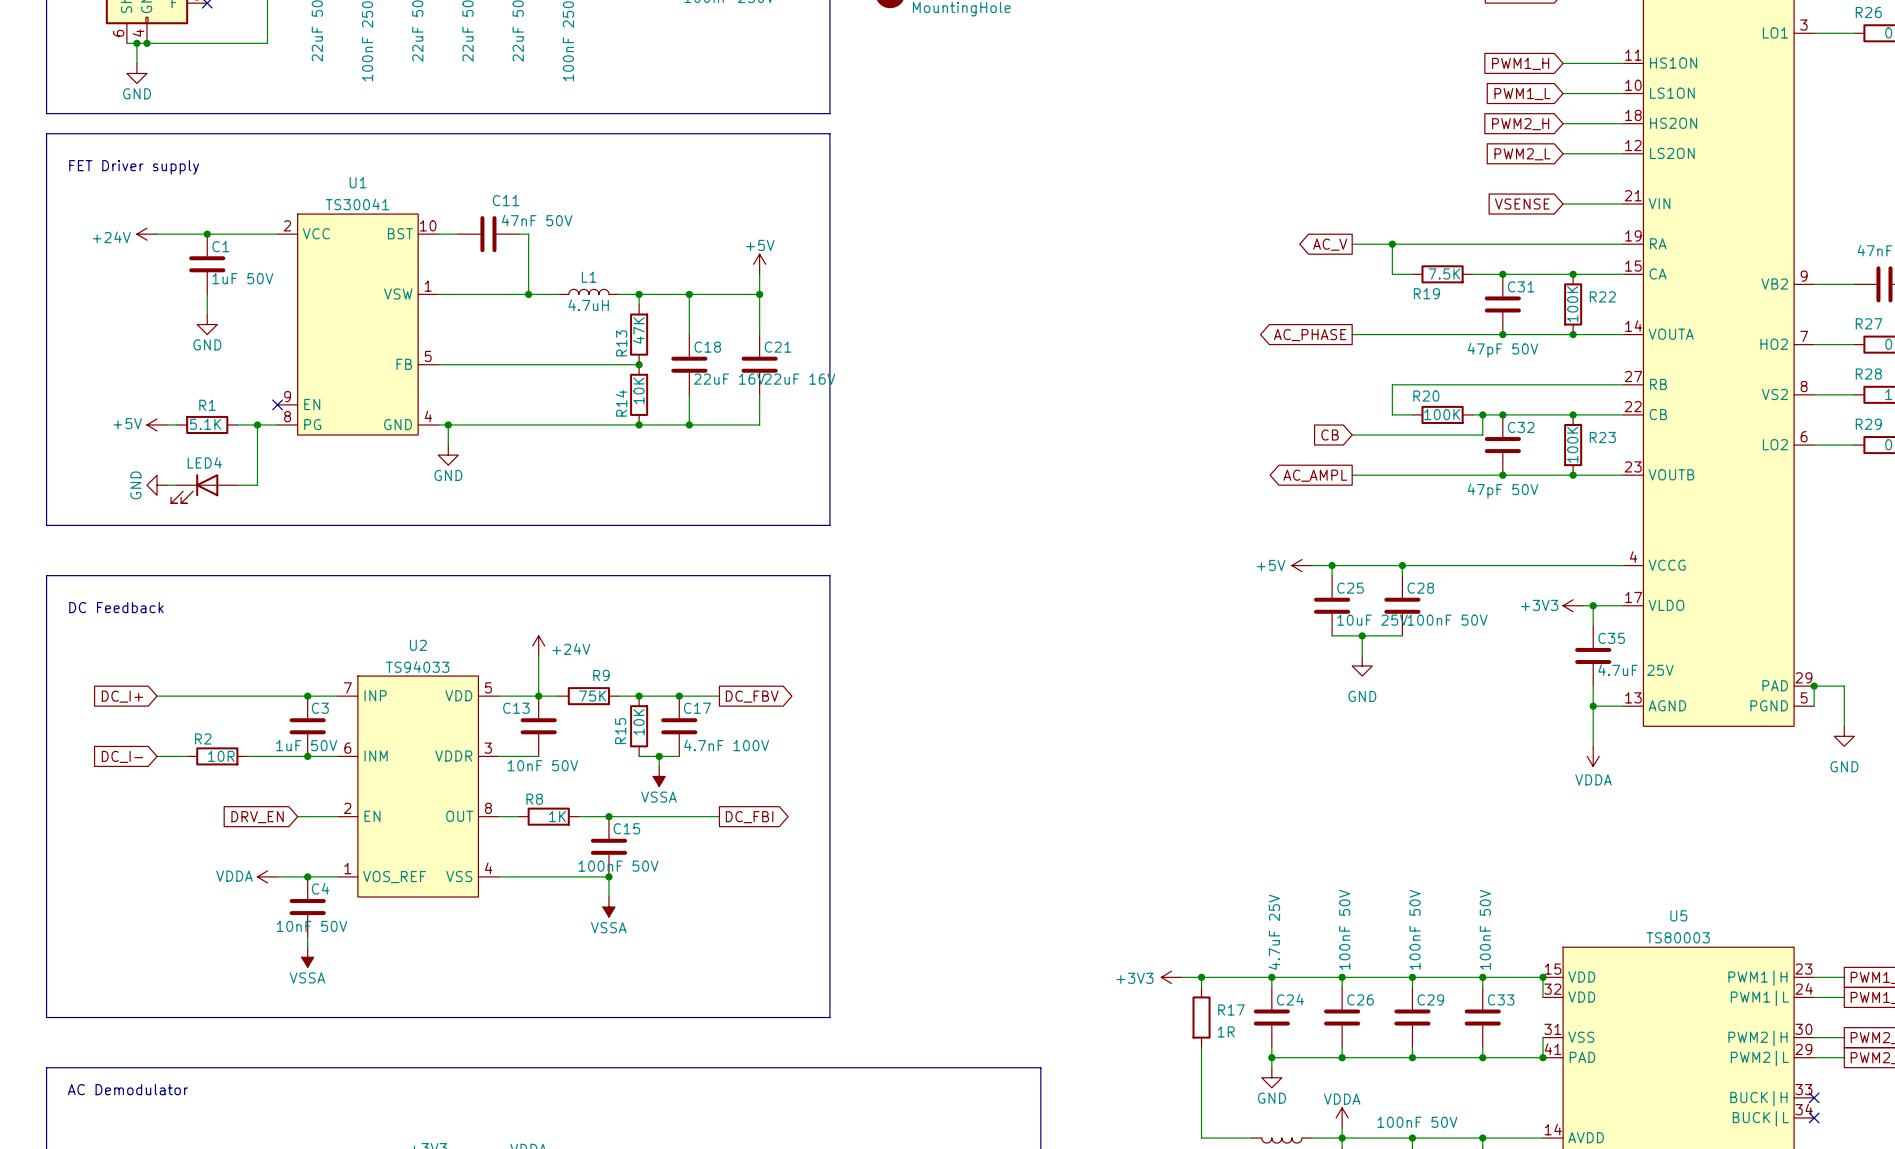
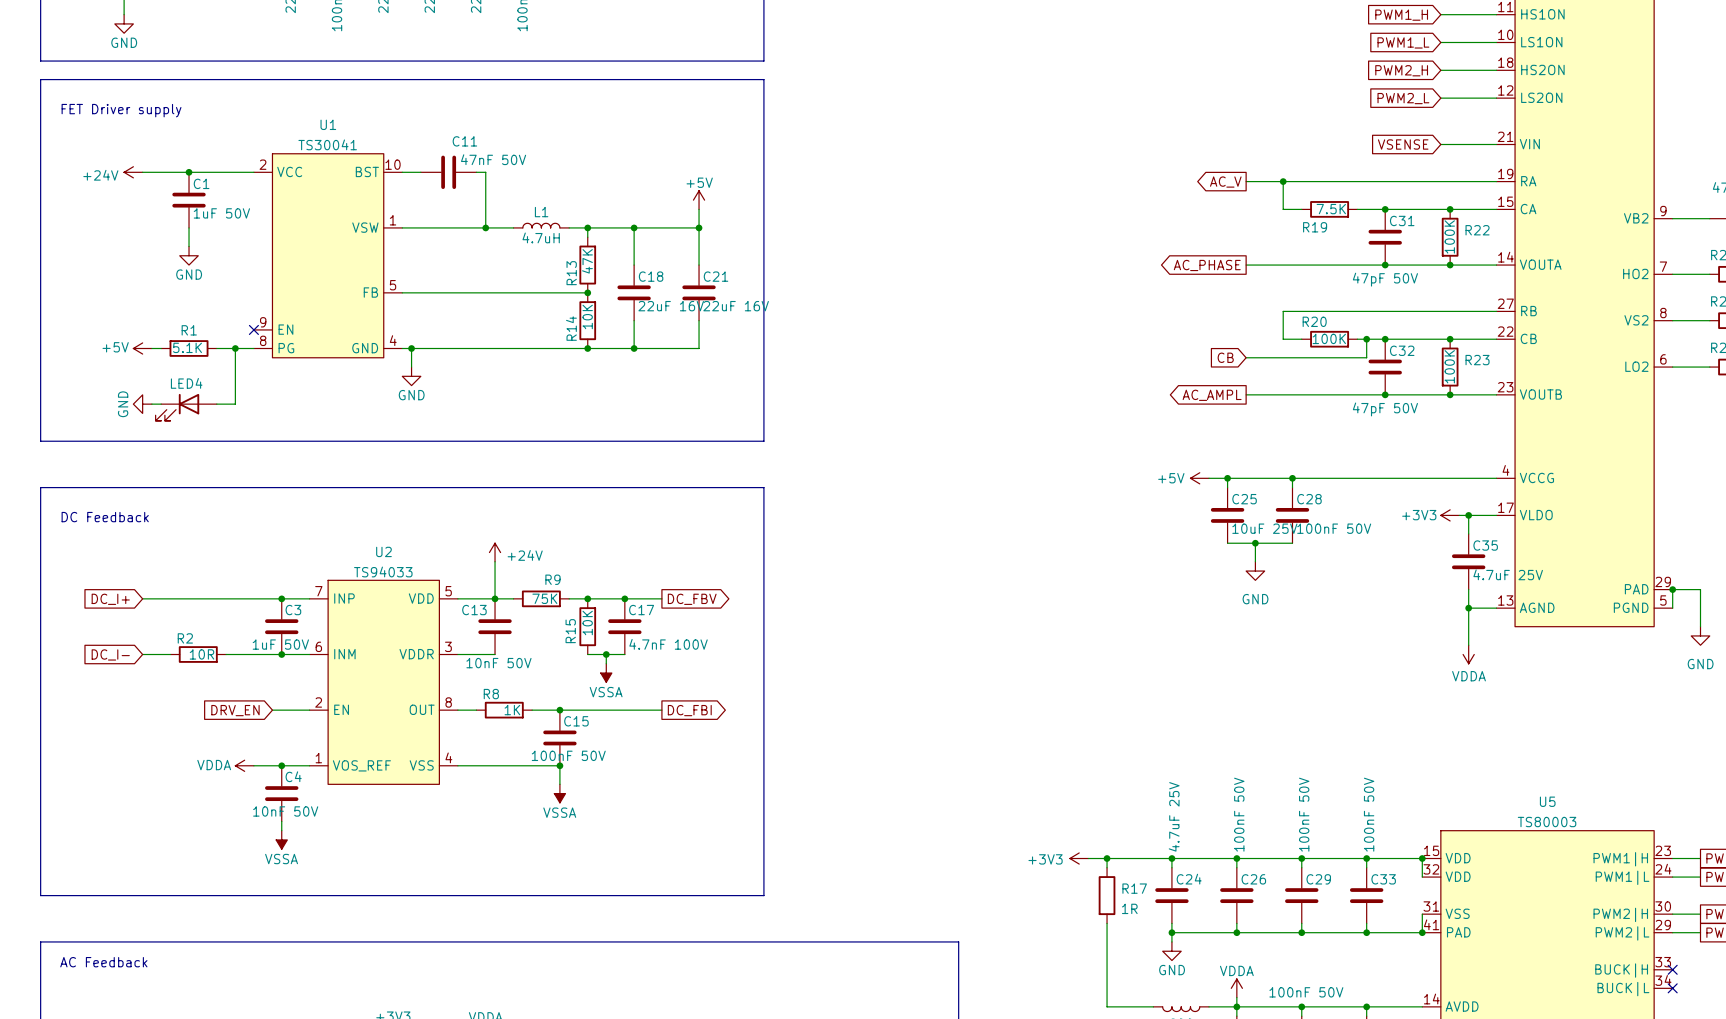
text: AC Demodulator (127, 1089) -> AC Feedback (103, 962)

